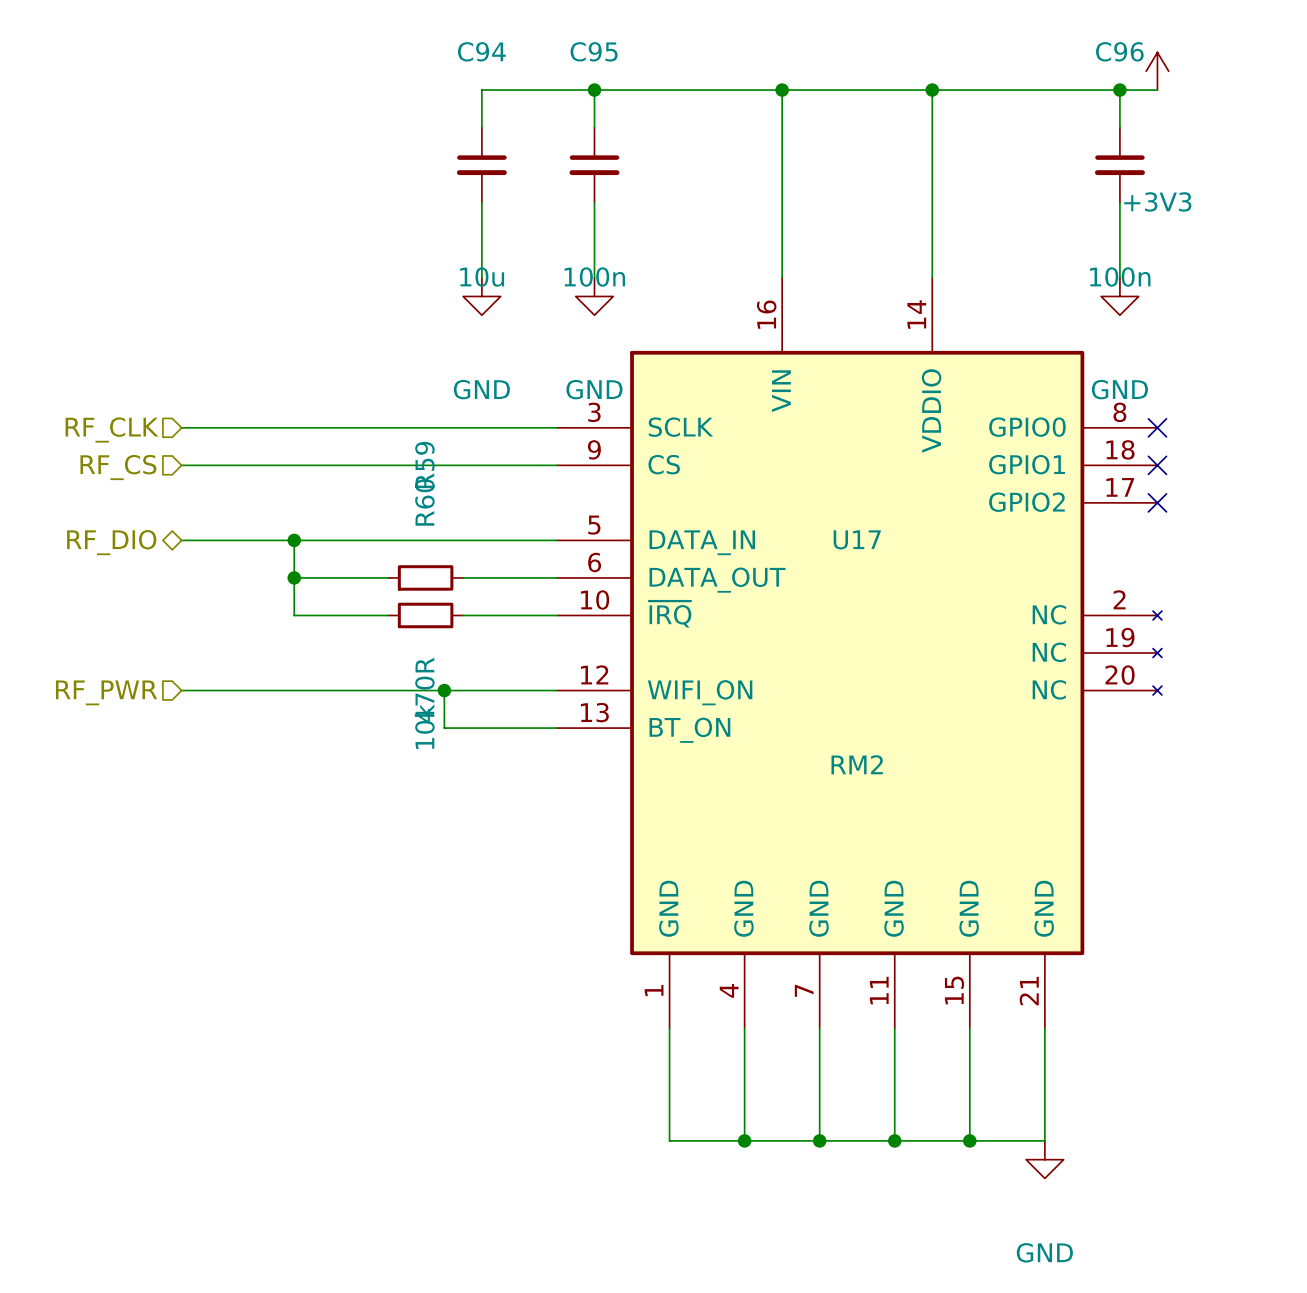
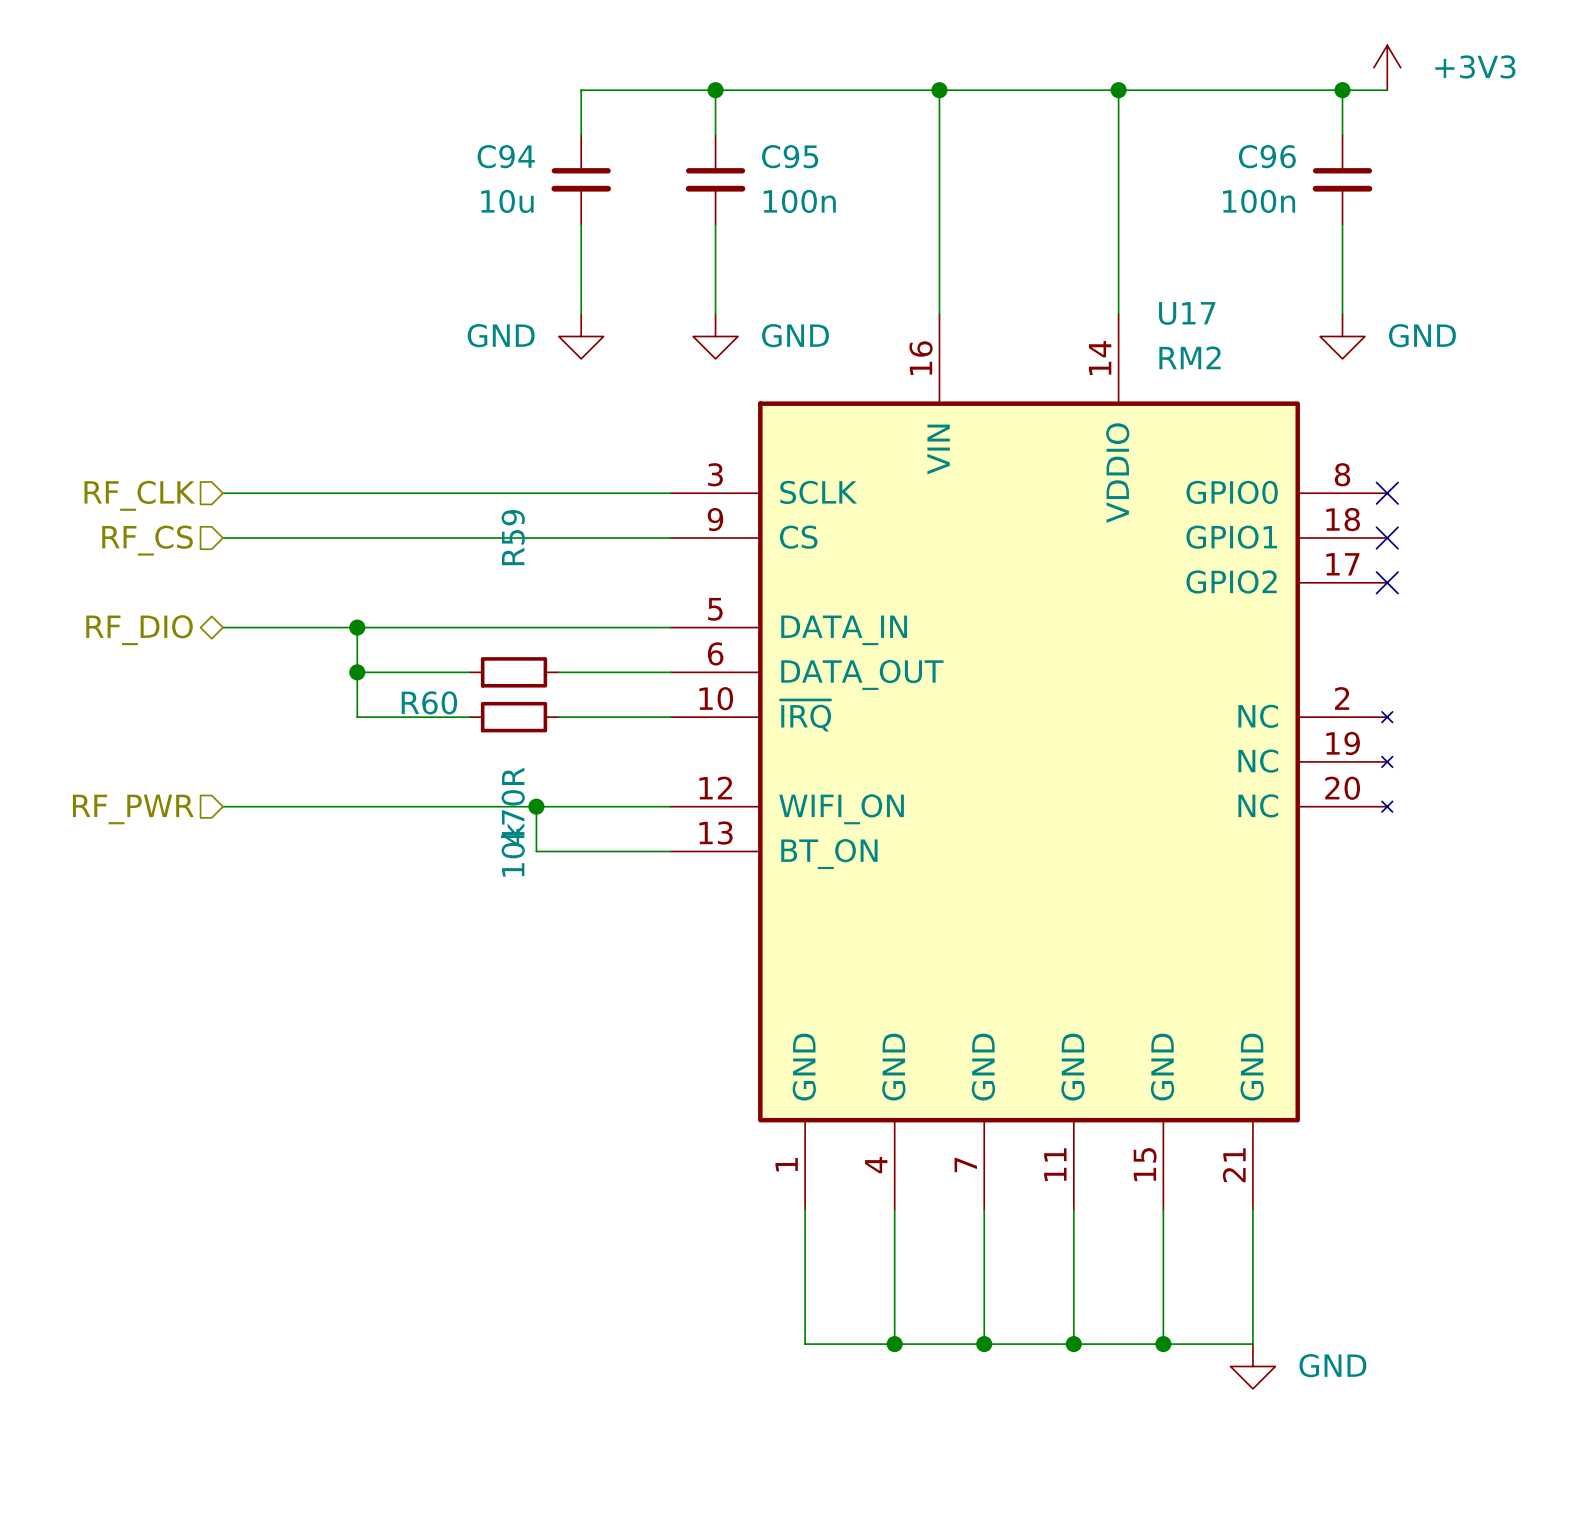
C94 name position: C94 (481, 51) -> C94 (506, 156)
C95 name position: C95 (594, 51) -> C95 (790, 156)
C96 name position: C96 (1119, 51) -> C96 (1267, 156)
power symbol text position: +3V3 (1157, 201) -> +3V3 (1475, 66)
C94 value position: 10u (482, 277) -> 10u (507, 201)
C95 value position: 100n (594, 277) -> 100n (799, 201)
C96 value position: 100n (1120, 277) -> 100n (1259, 201)
power symbol text position: GND (481, 389) -> GND (501, 335)
power symbol text position: GND (594, 389) -> GND (795, 335)
power symbol text position: GND (1119, 389) -> GND (1422, 335)
R60 name rotation: 0° (424, 502) -> 90° clockwise (429, 702)
R60 name position: R60 (424, 502) -> R60 (429, 702)
U17 name position: U17 (857, 539) -> U17 (1187, 313)
U17 value position: RM2 (857, 764) -> RM2 (1190, 357)
power symbol text position: GND (1044, 1252) -> GND (1332, 1365)

